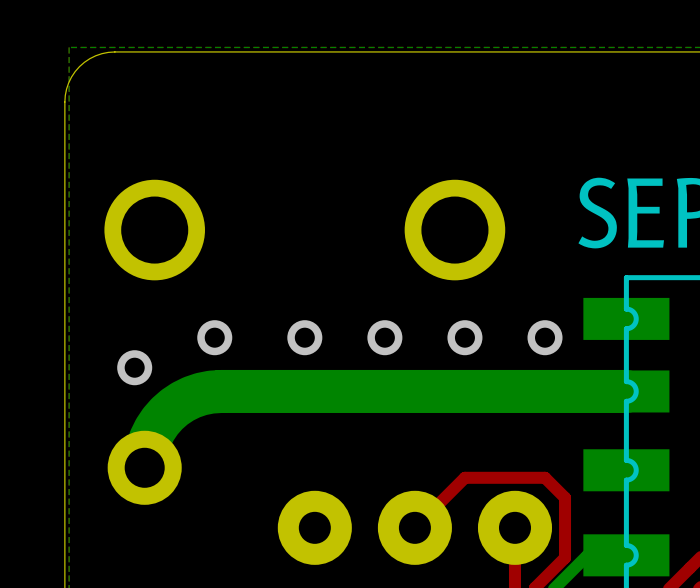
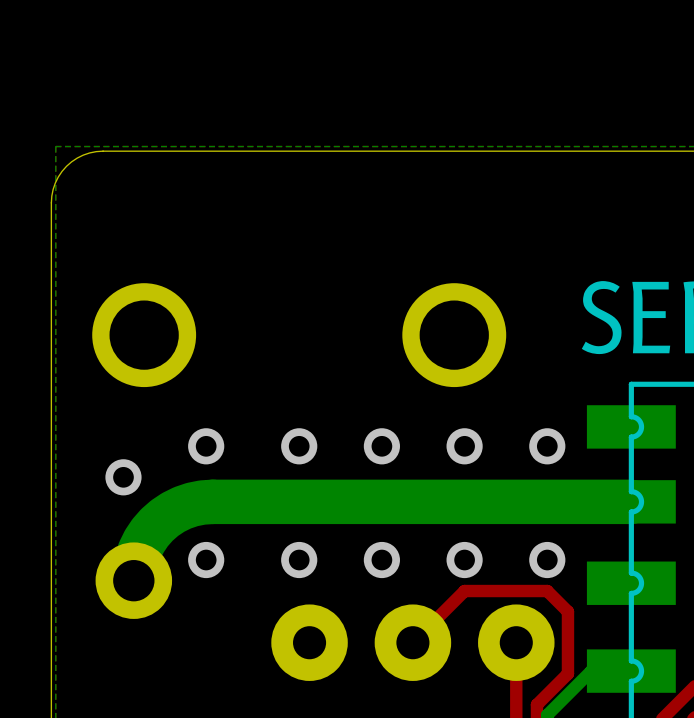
via: none -> (206, 560)
via: none -> (299, 560)
via: none -> (381, 560)
via: none -> (464, 560)
via: none -> (547, 560)

